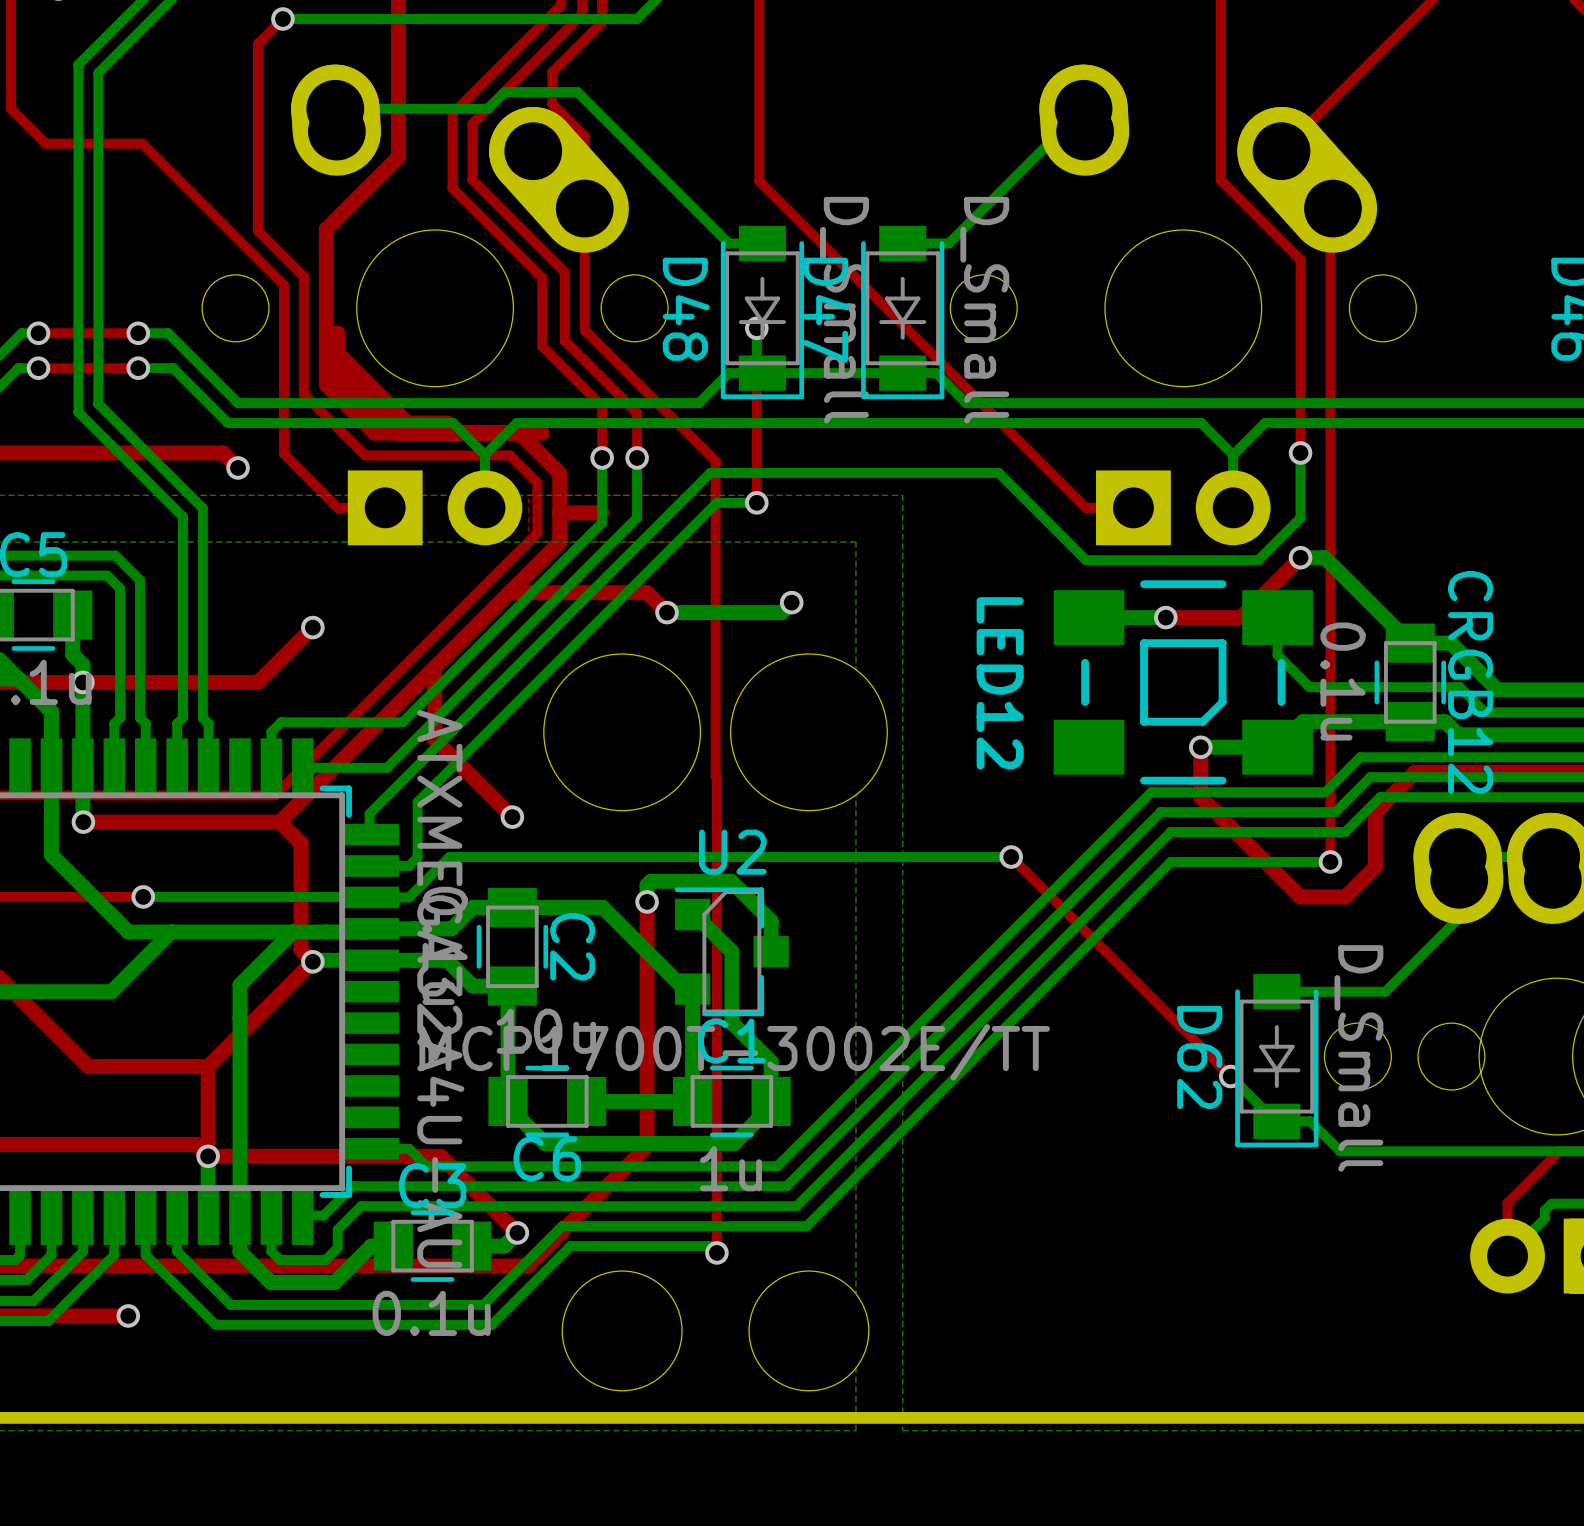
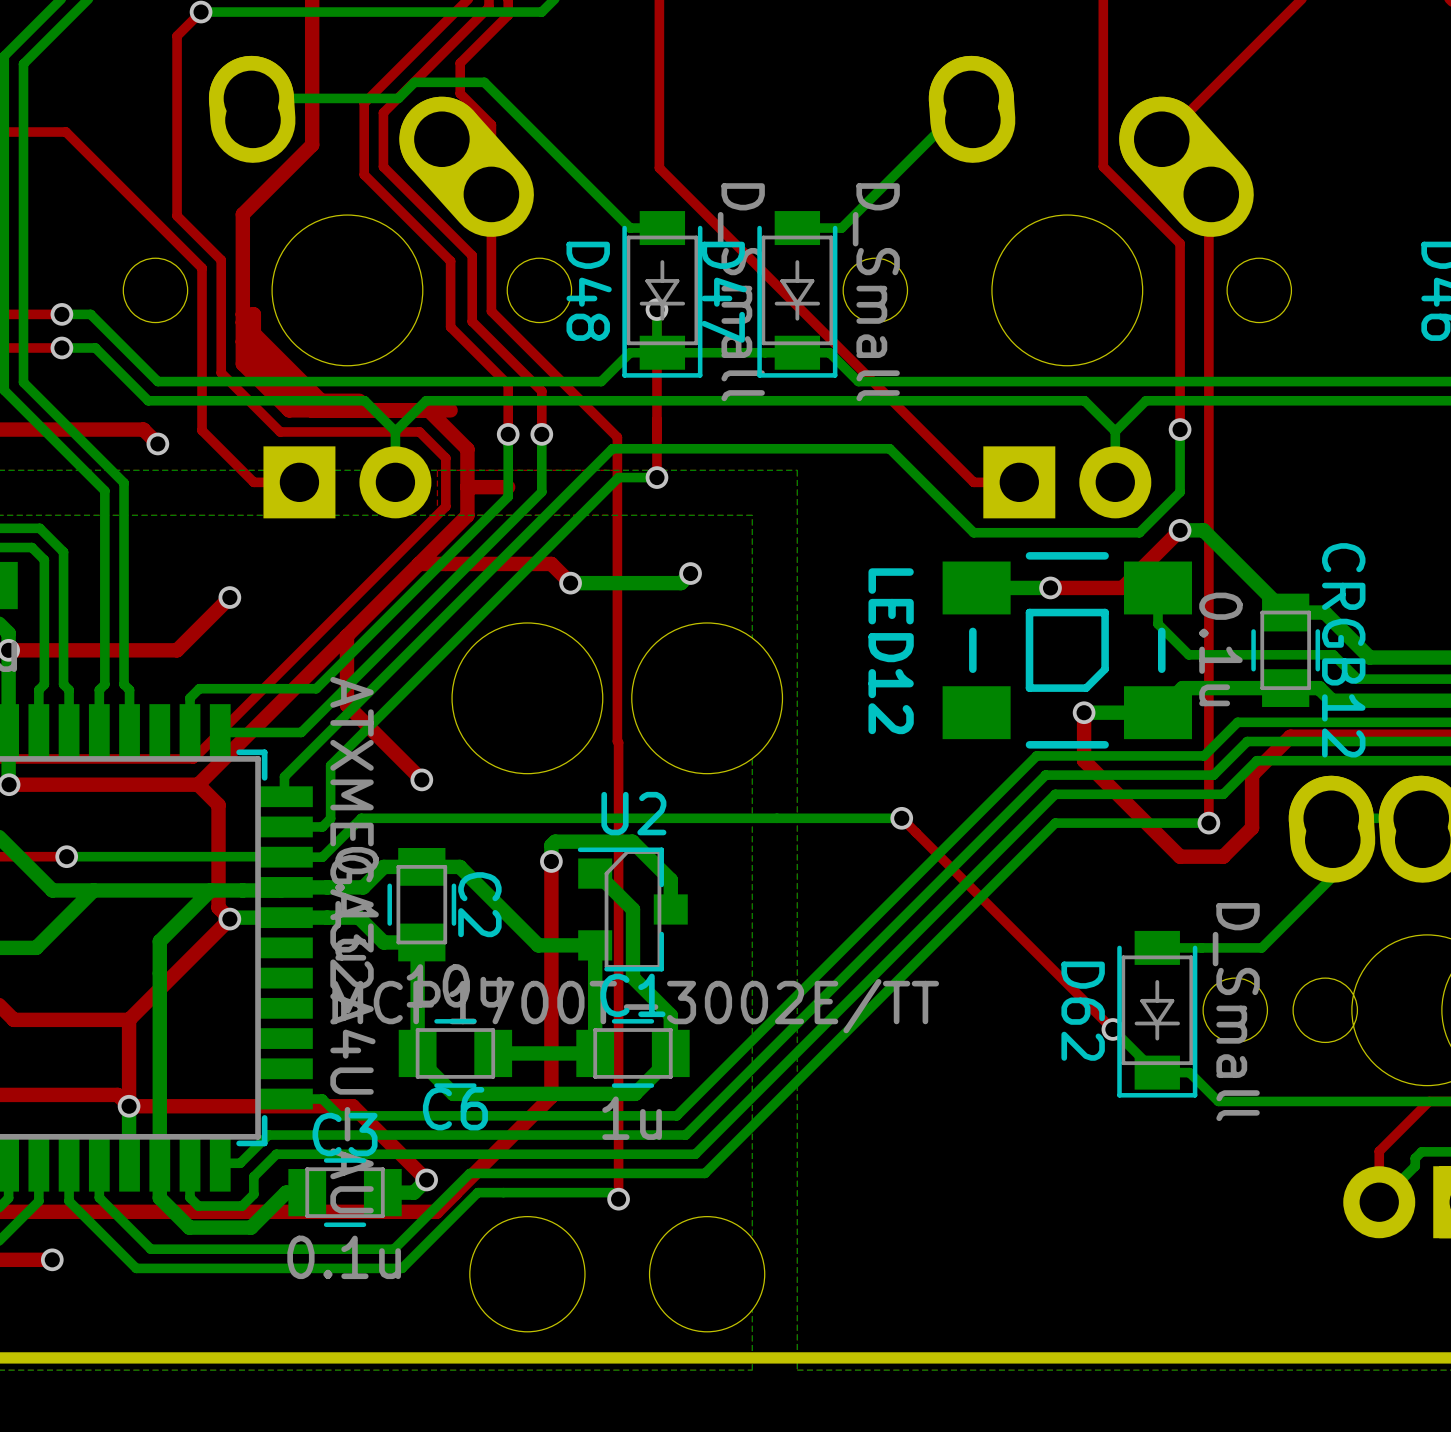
bottom track: (551, 907) (602, 907) (684, 989) -> (459, 866) (538, 945) (587, 945)

